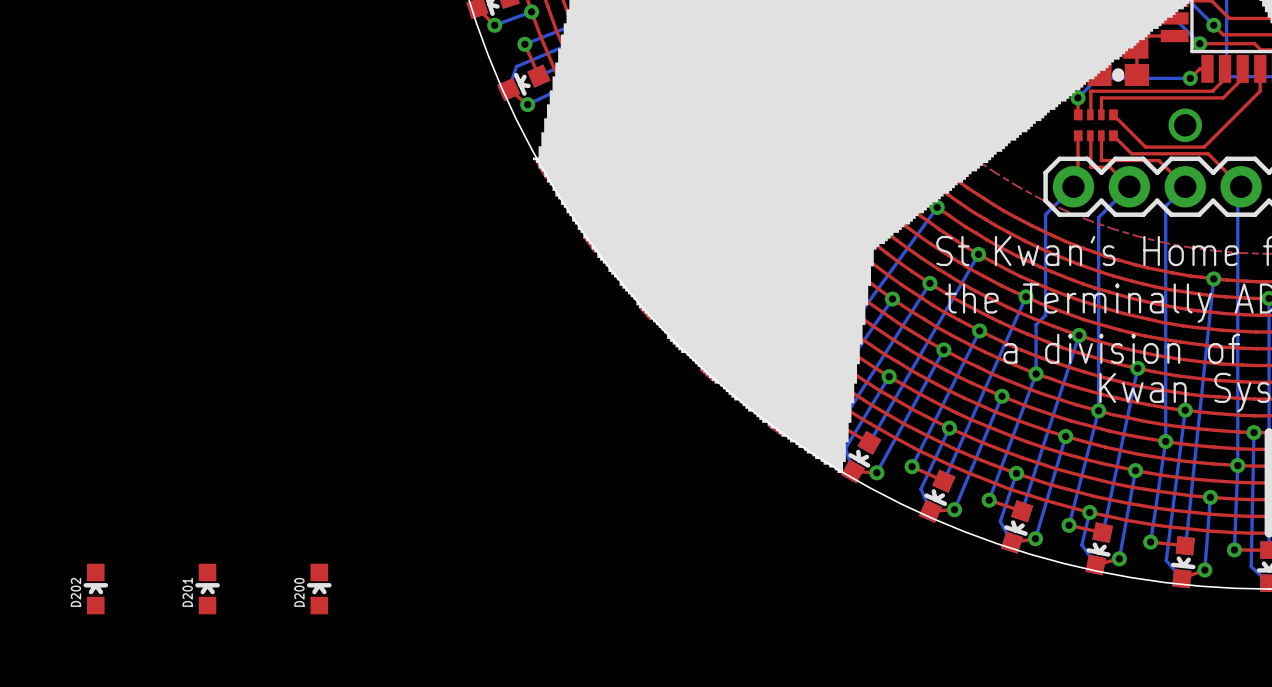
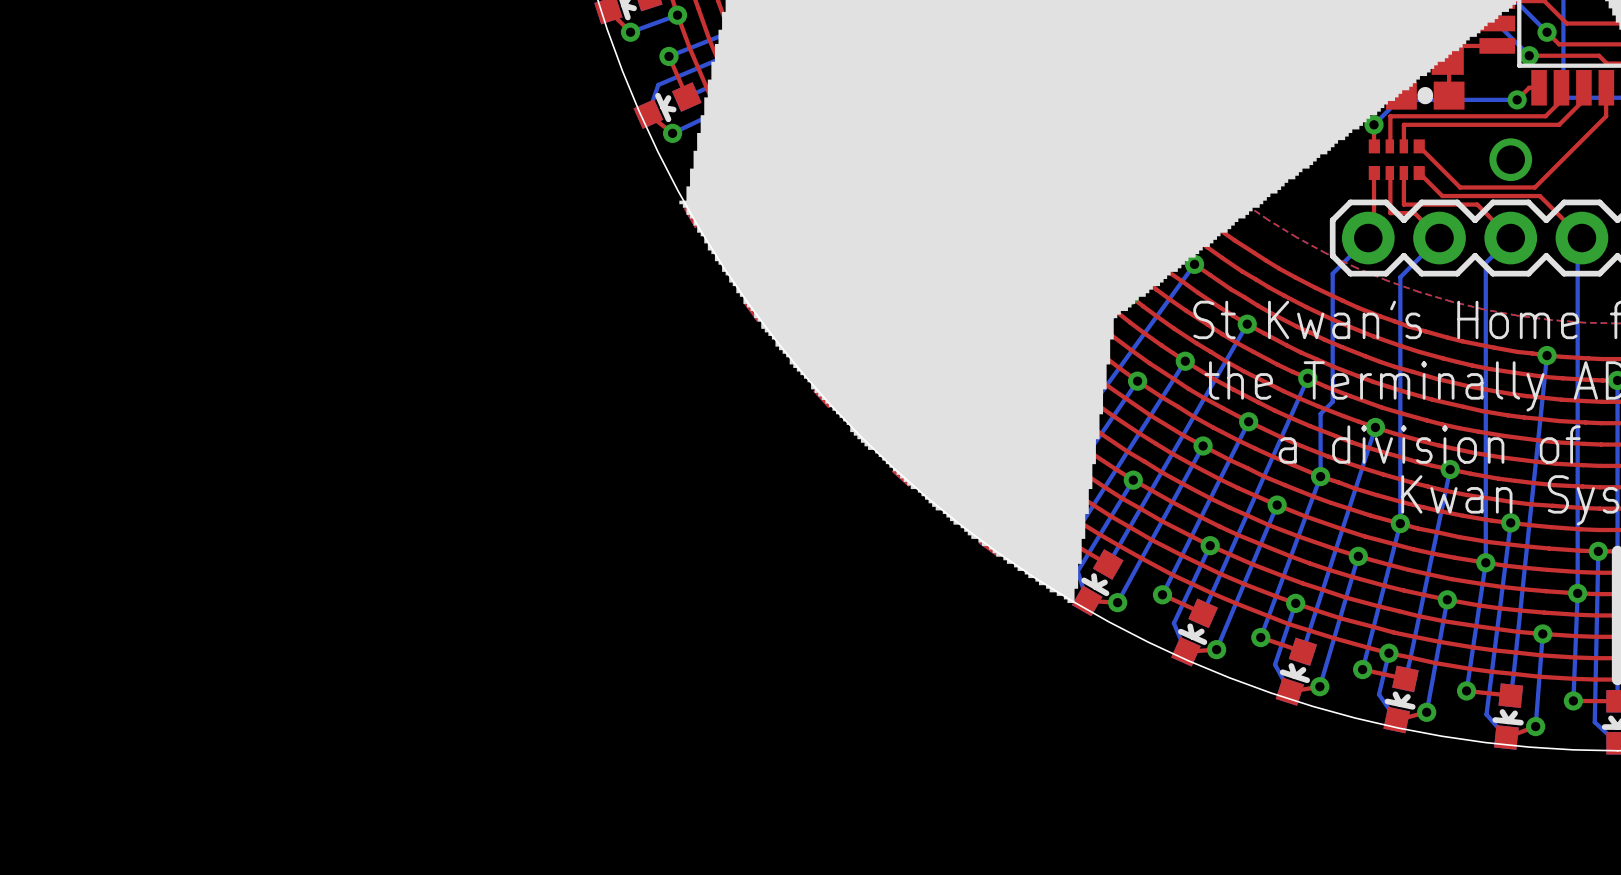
D202: (95, 589) -> none
D201: (207, 589) -> none
D200: (319, 589) -> none

